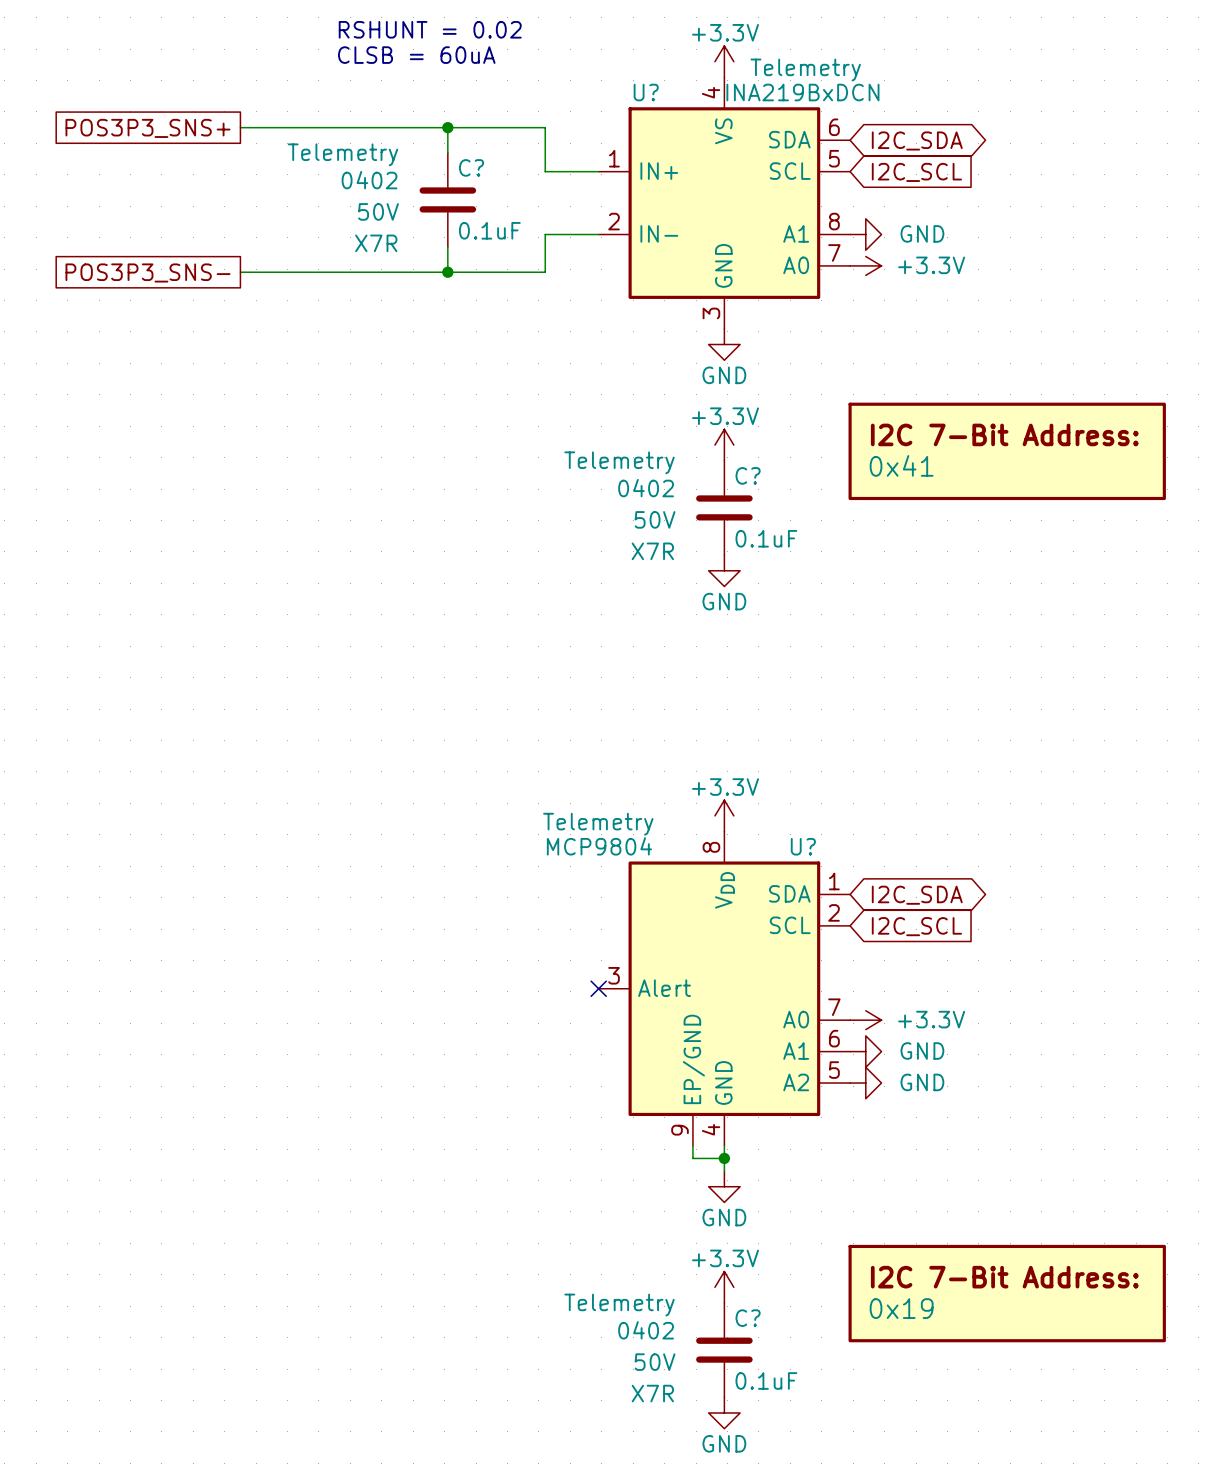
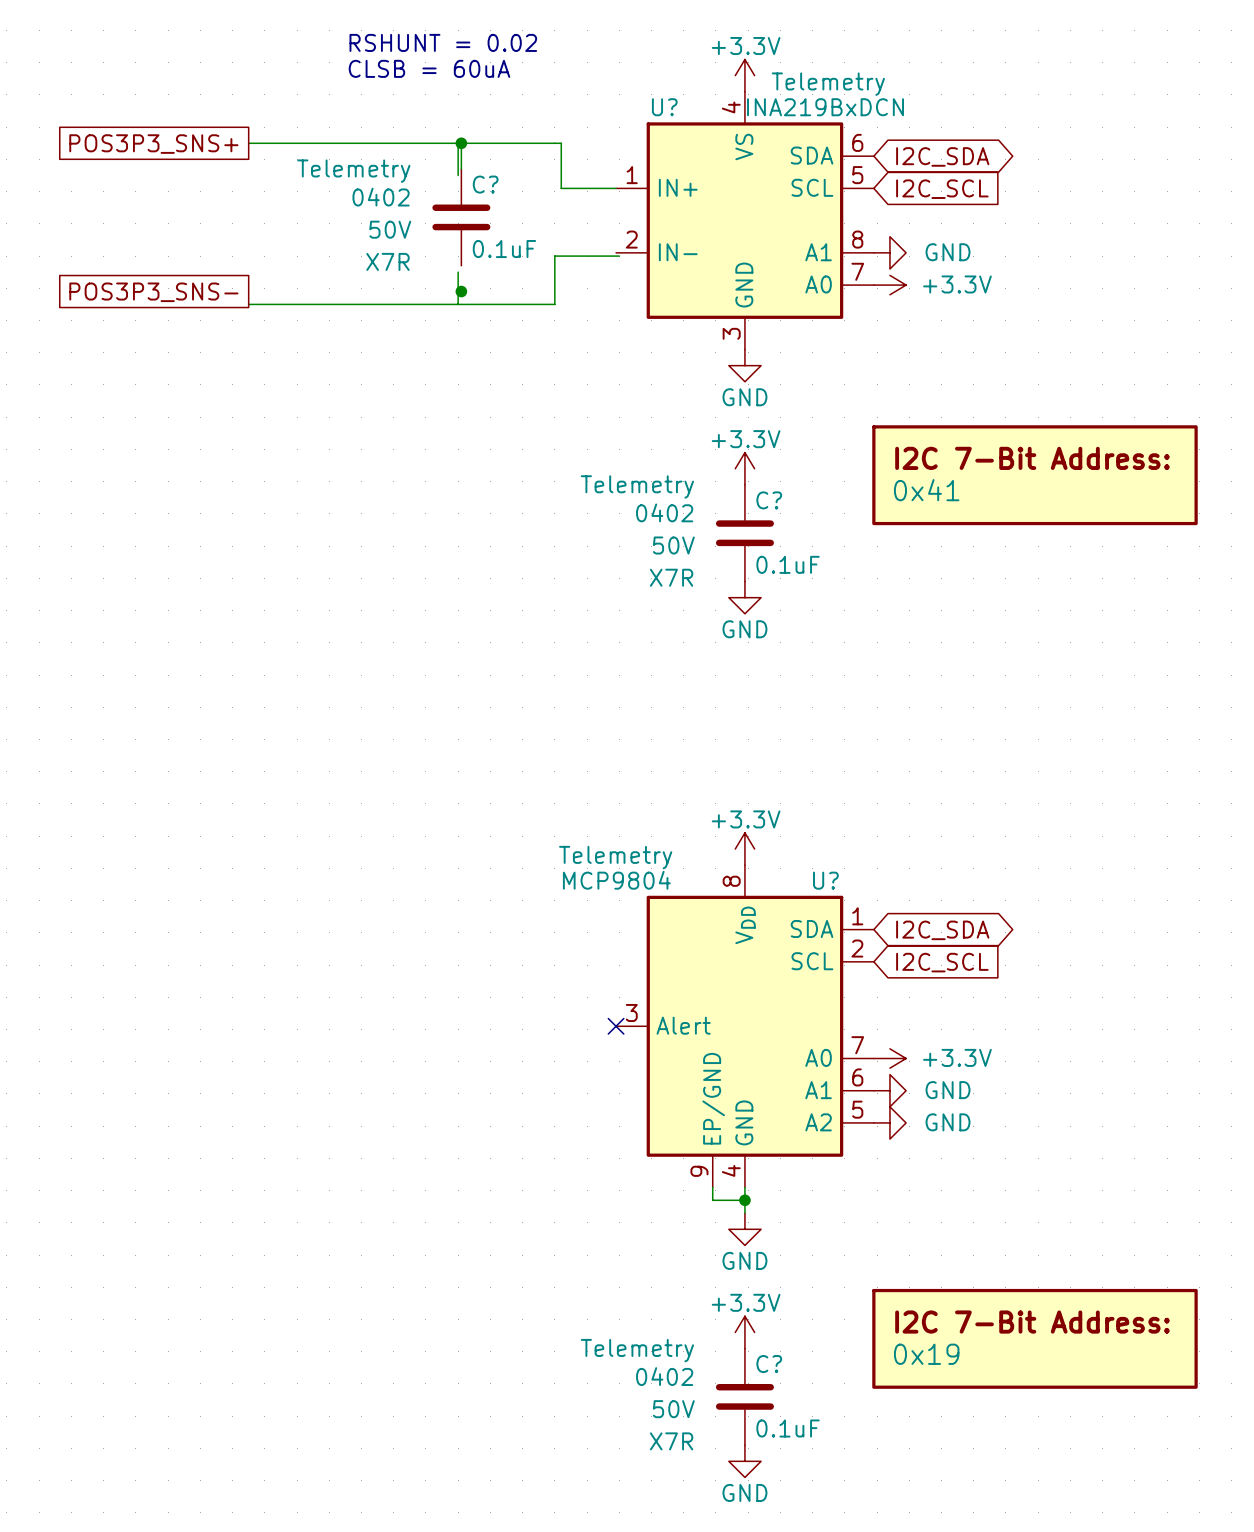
wire: none -> (458, 143) (458, 175)
wire: (598, 234) (545, 234) (545, 272) (240, 272) -> none
wire: none -> (619, 256) (554, 256) (554, 304) (248, 304)
wire: (447, 247) (447, 272) -> none
wire: none -> (458, 272) (458, 304)

